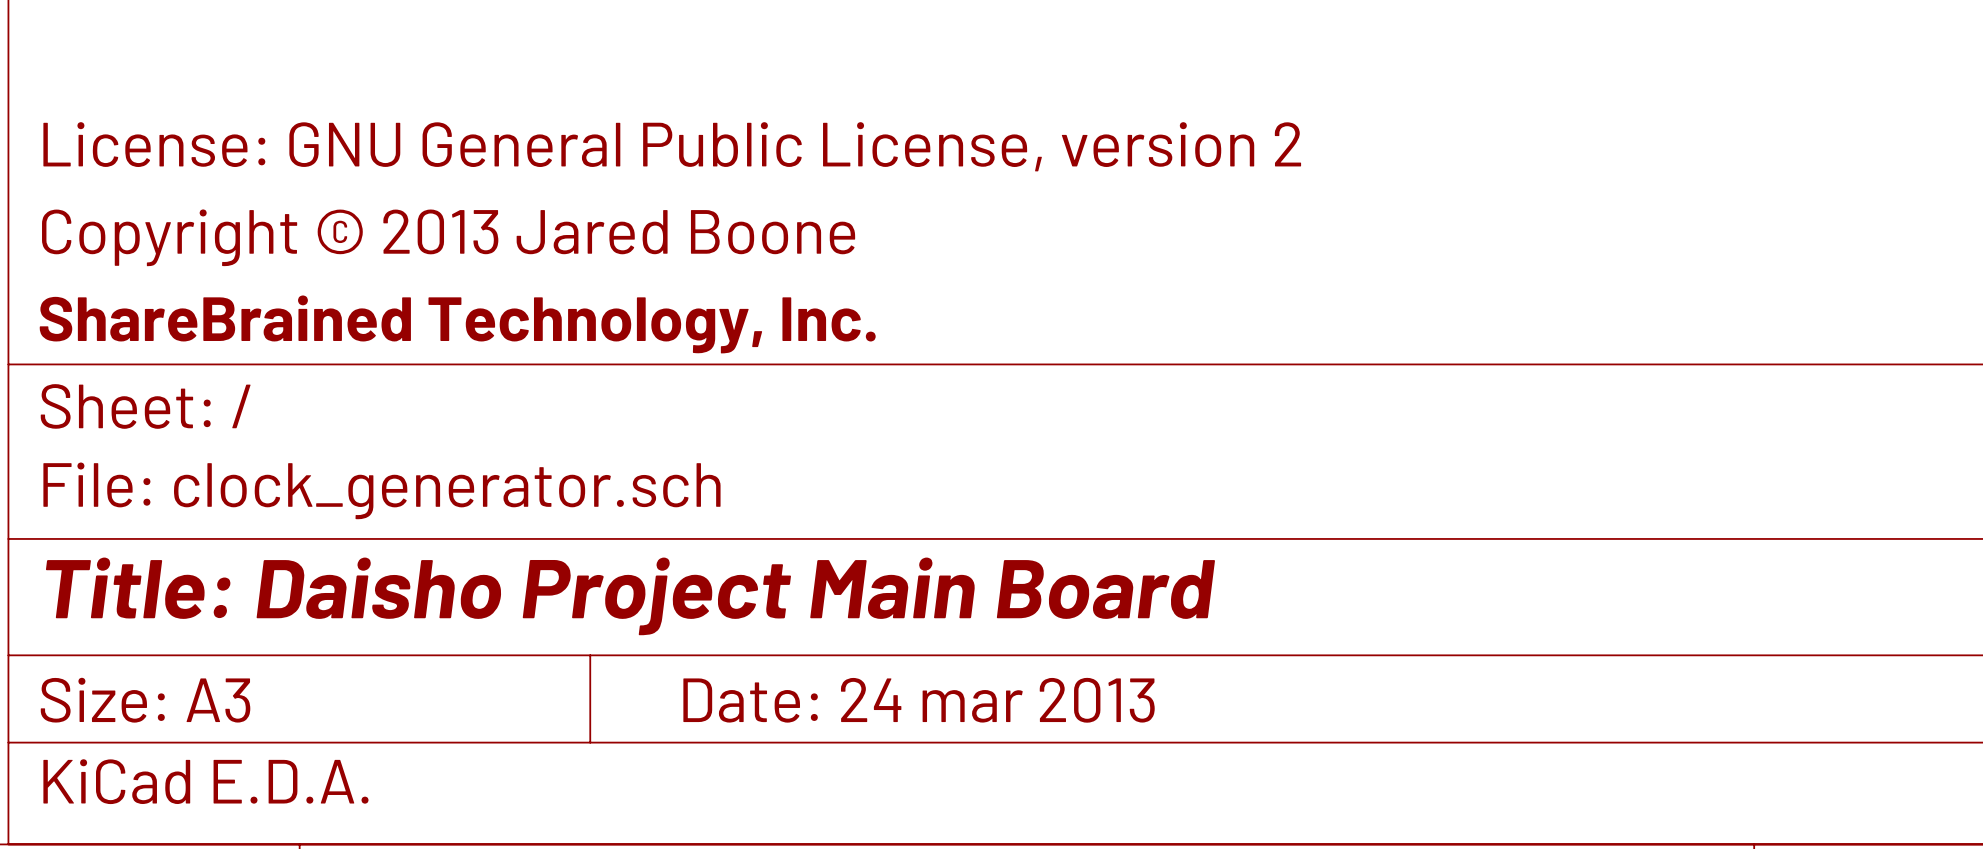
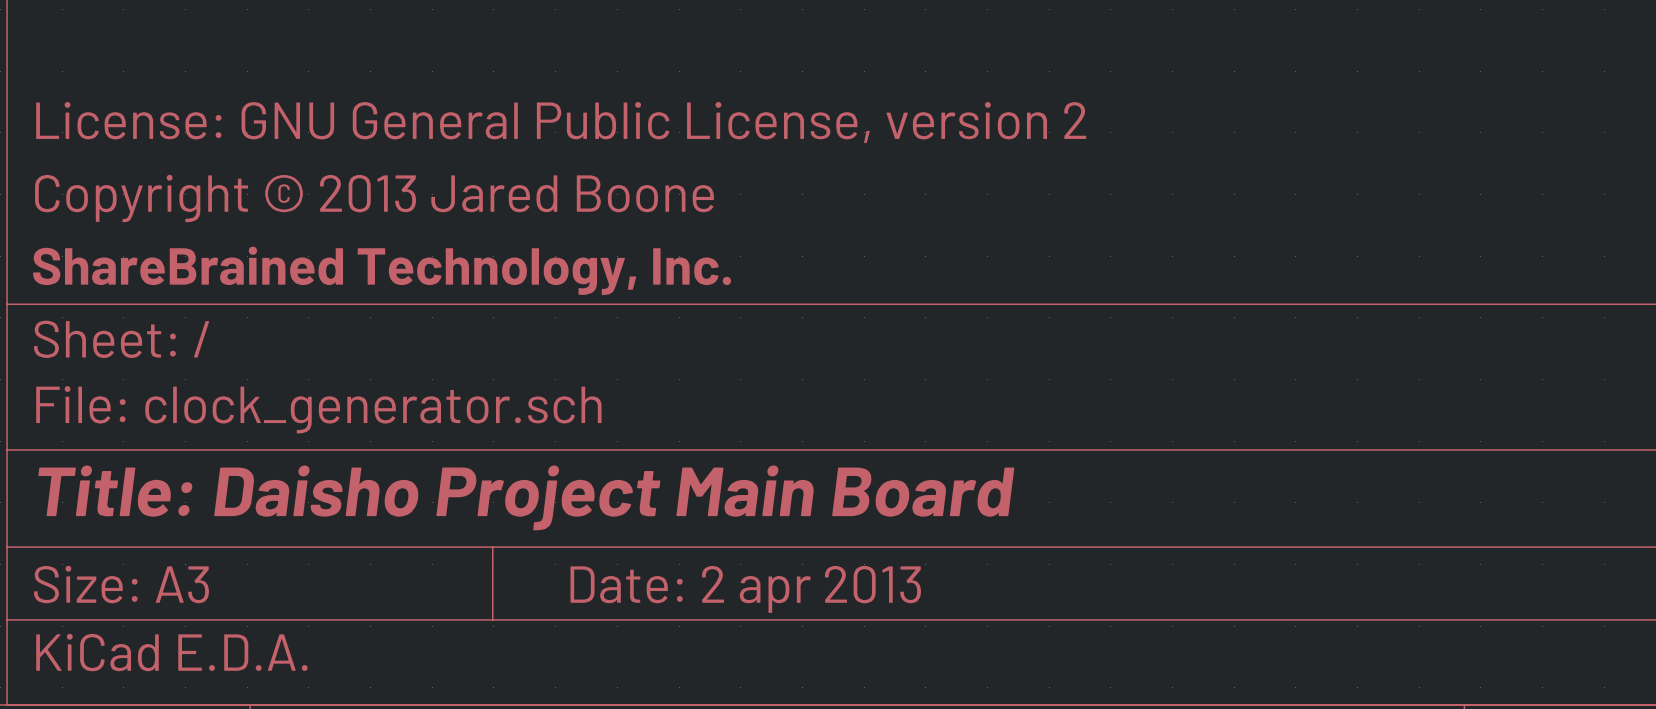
title block: Date: 24 mar 2013 (919, 700) -> Date: 2 apr 2013 (745, 589)

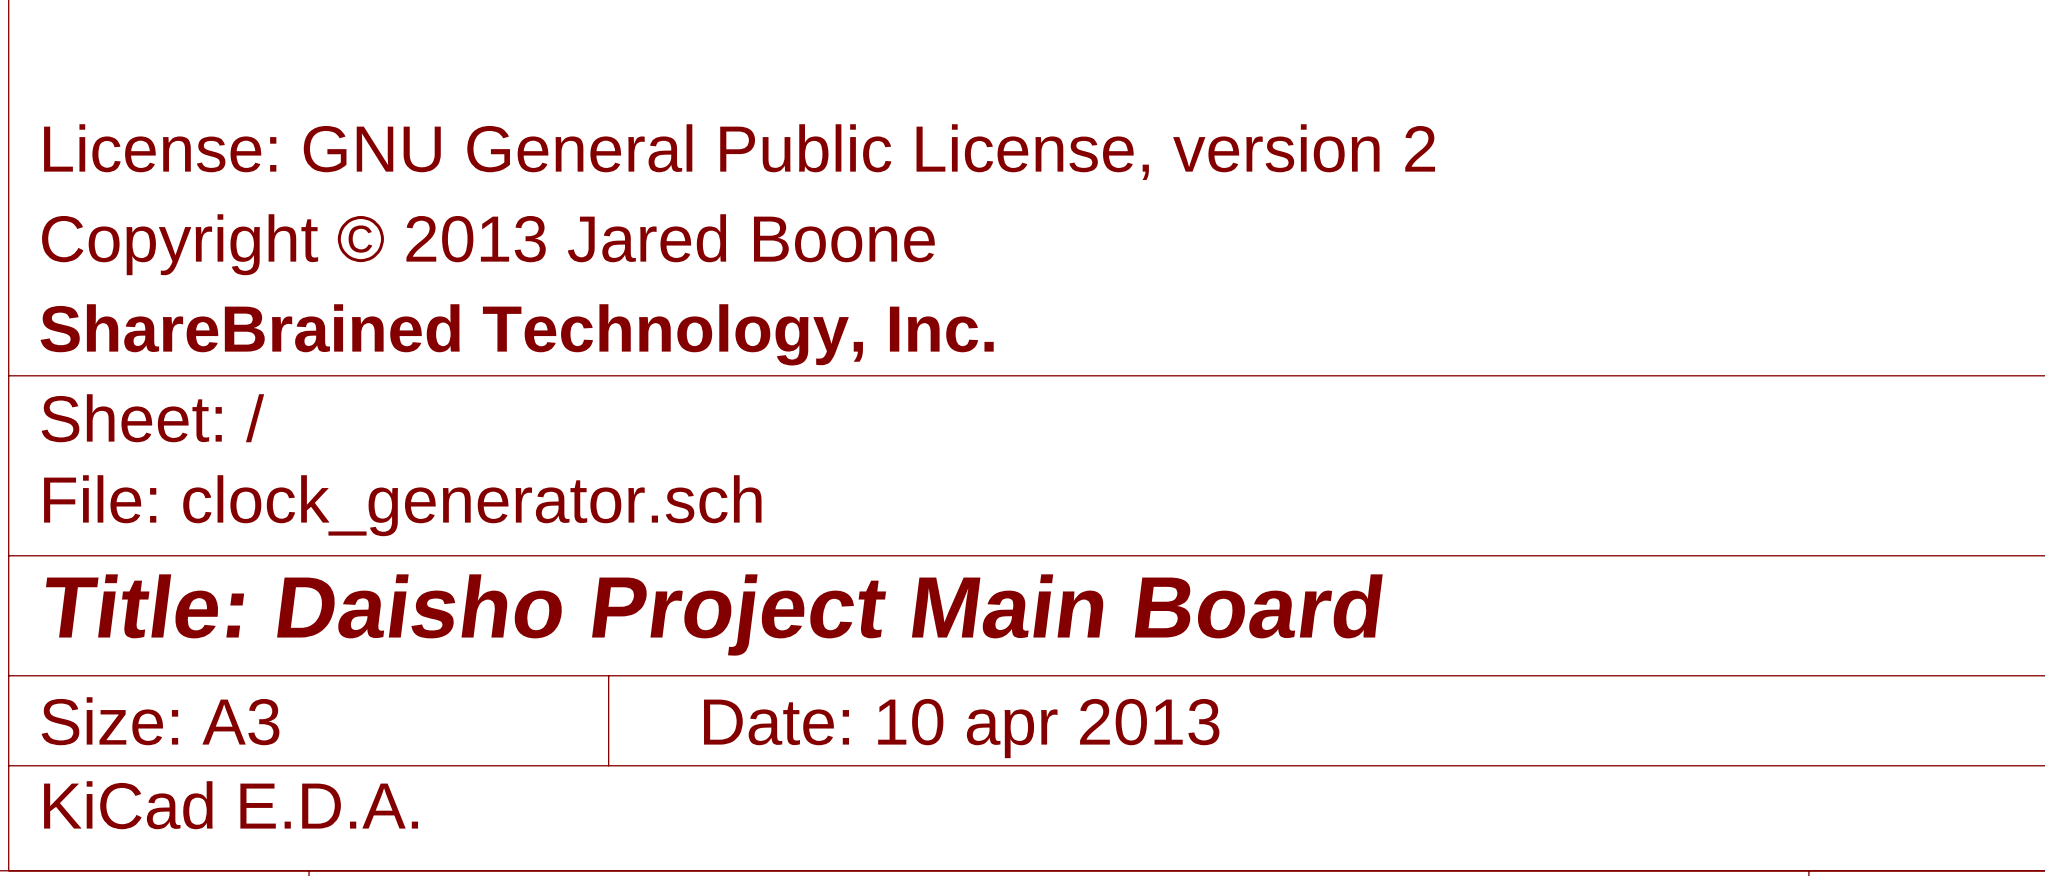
title block: Date: 2 apr 2013 (745, 589) -> Date: 10 apr 2013 (961, 728)

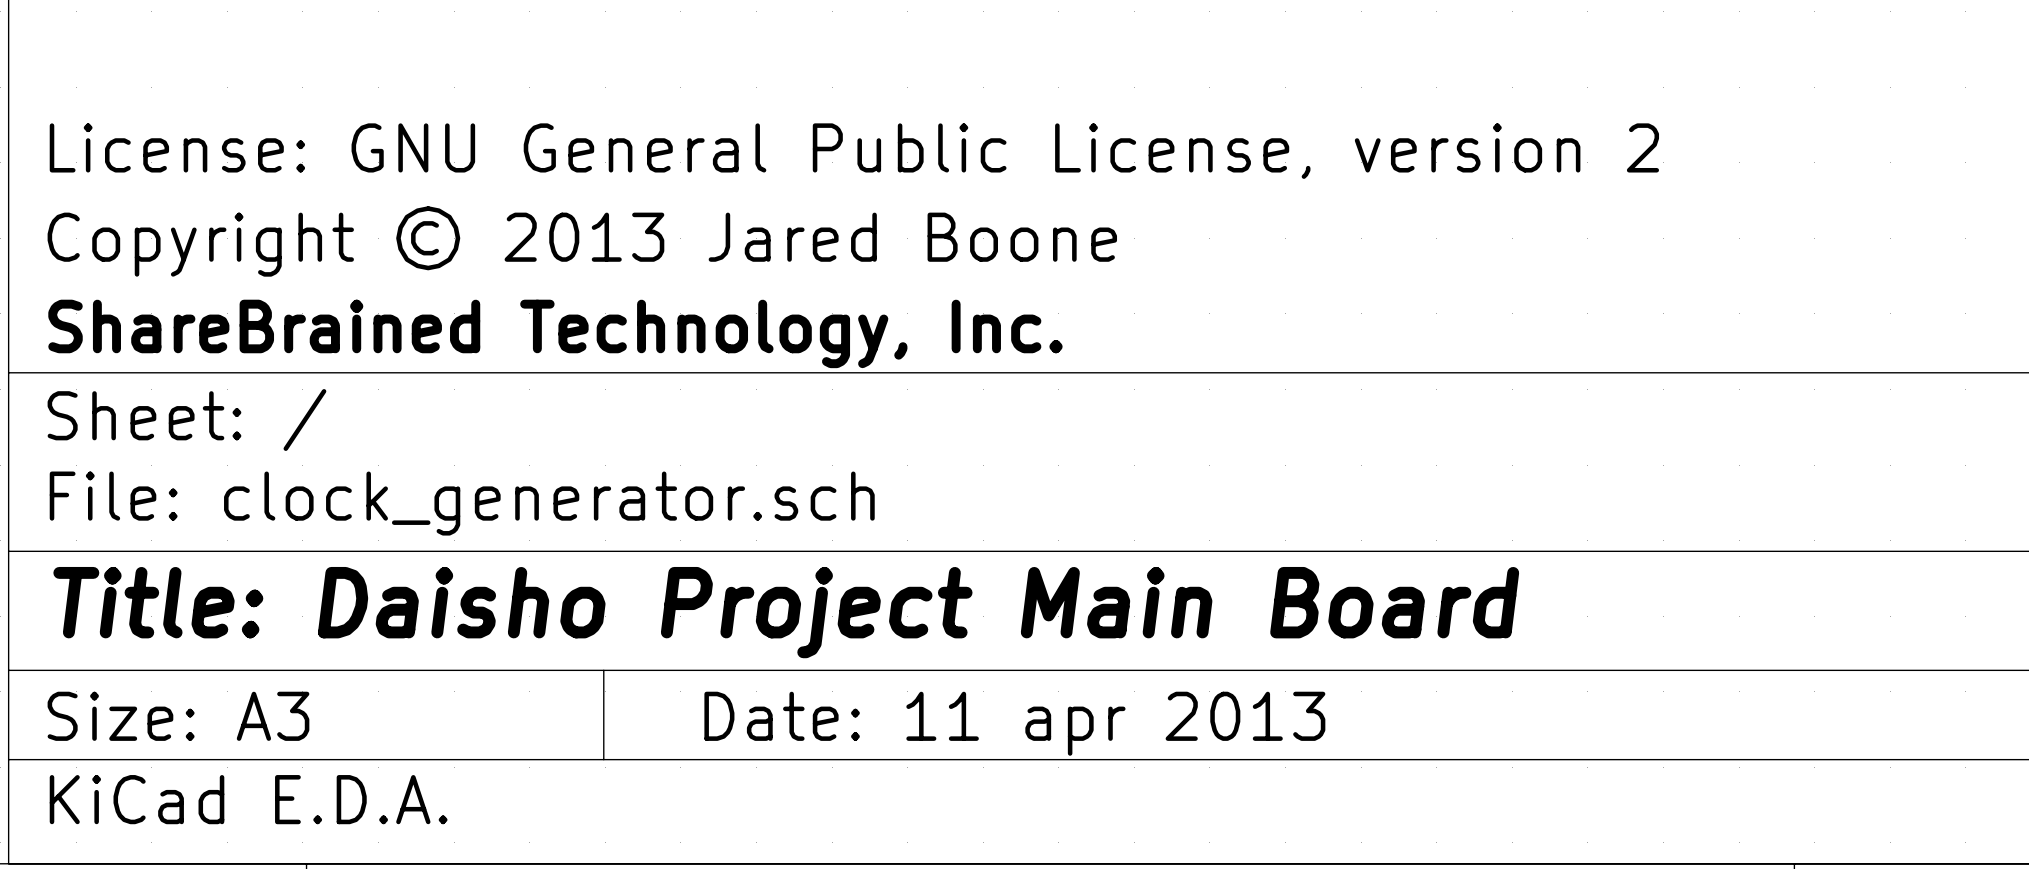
title block: Date: 10 apr 2013 (961, 728) -> Date: 11 apr 2013 (1014, 723)

